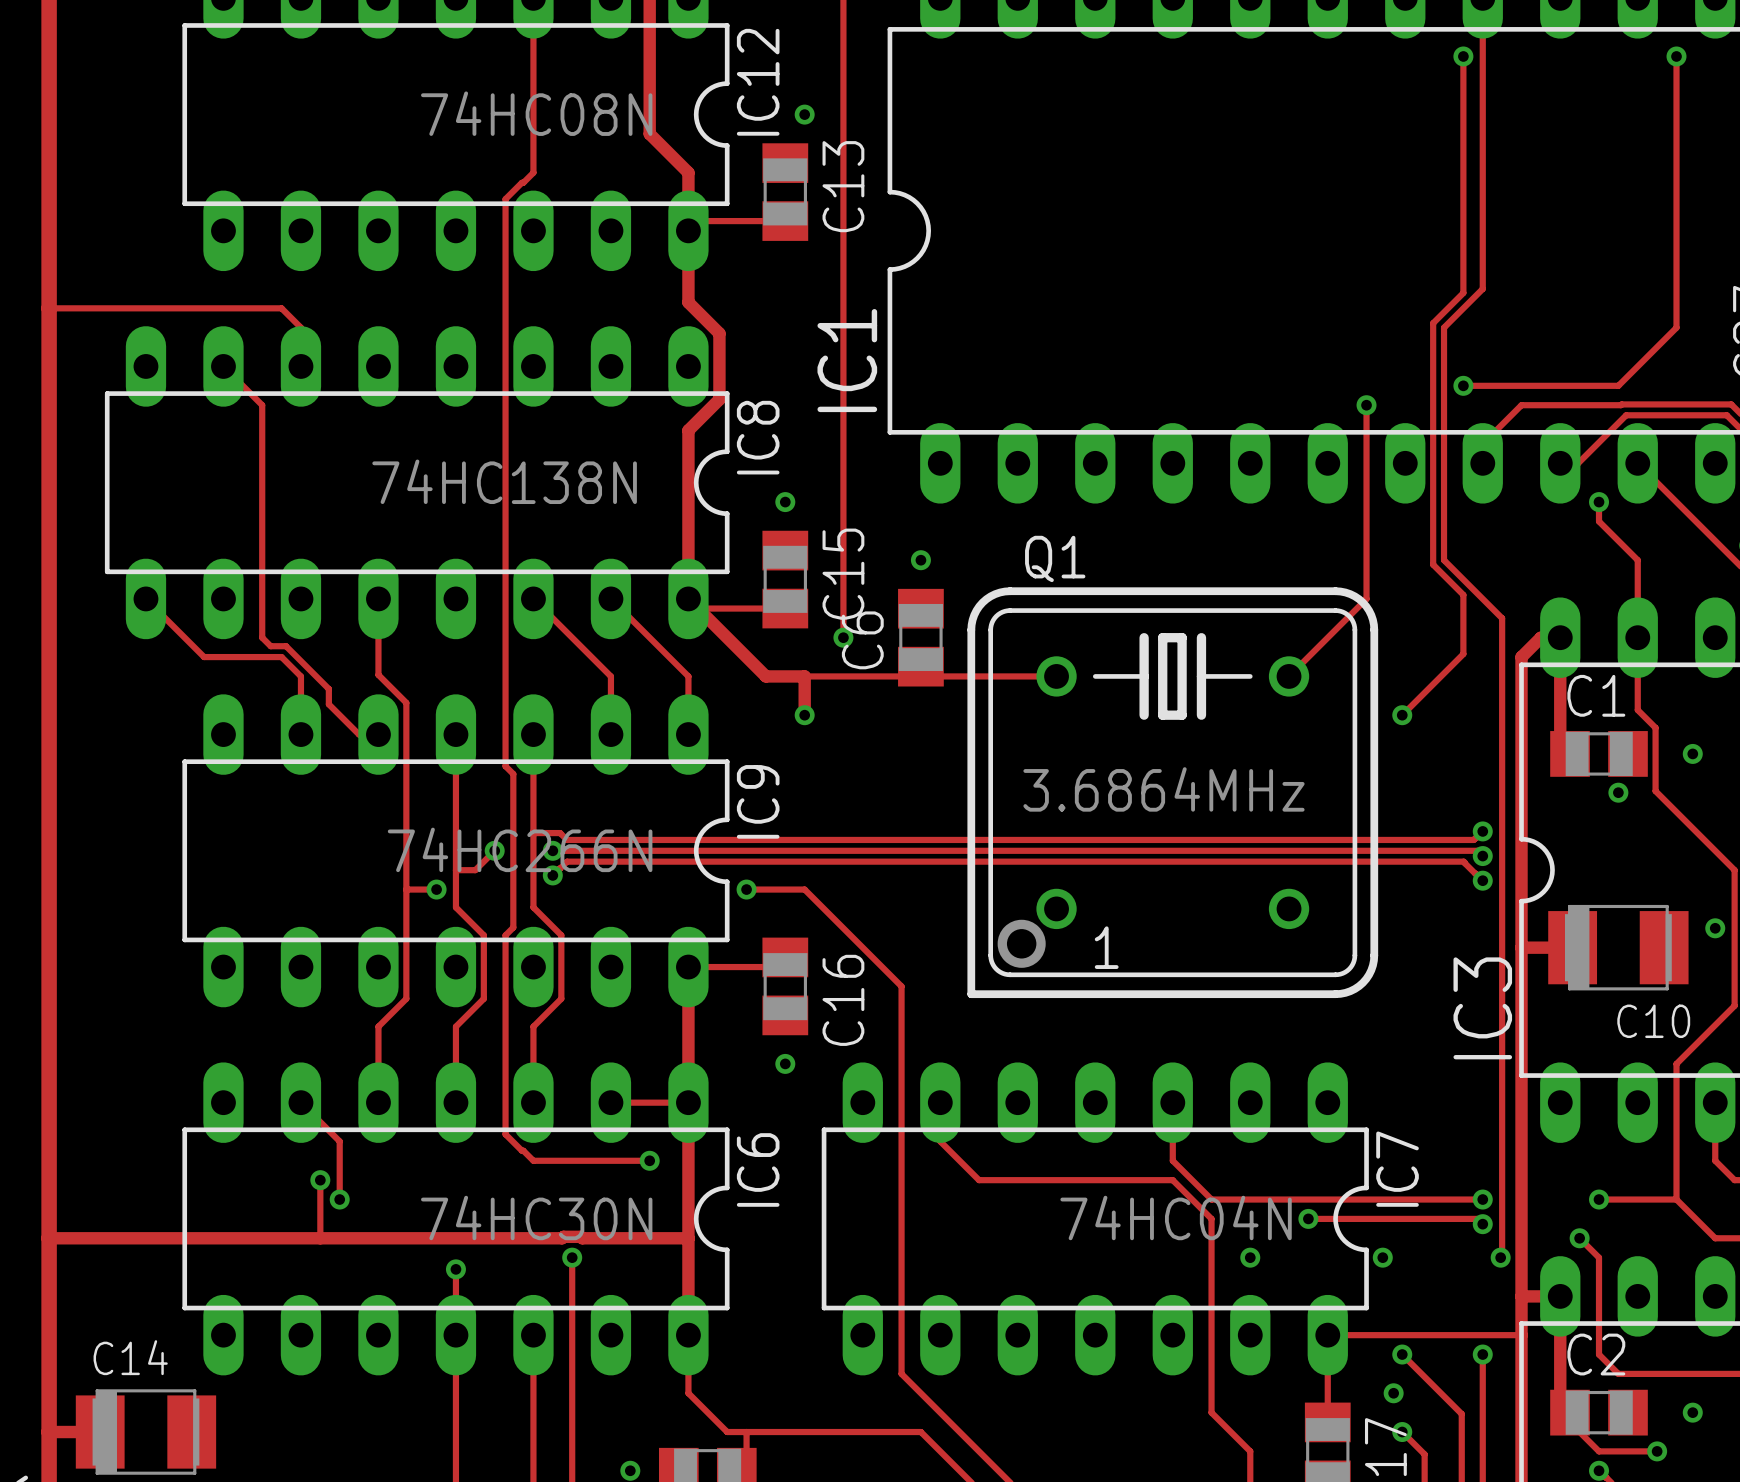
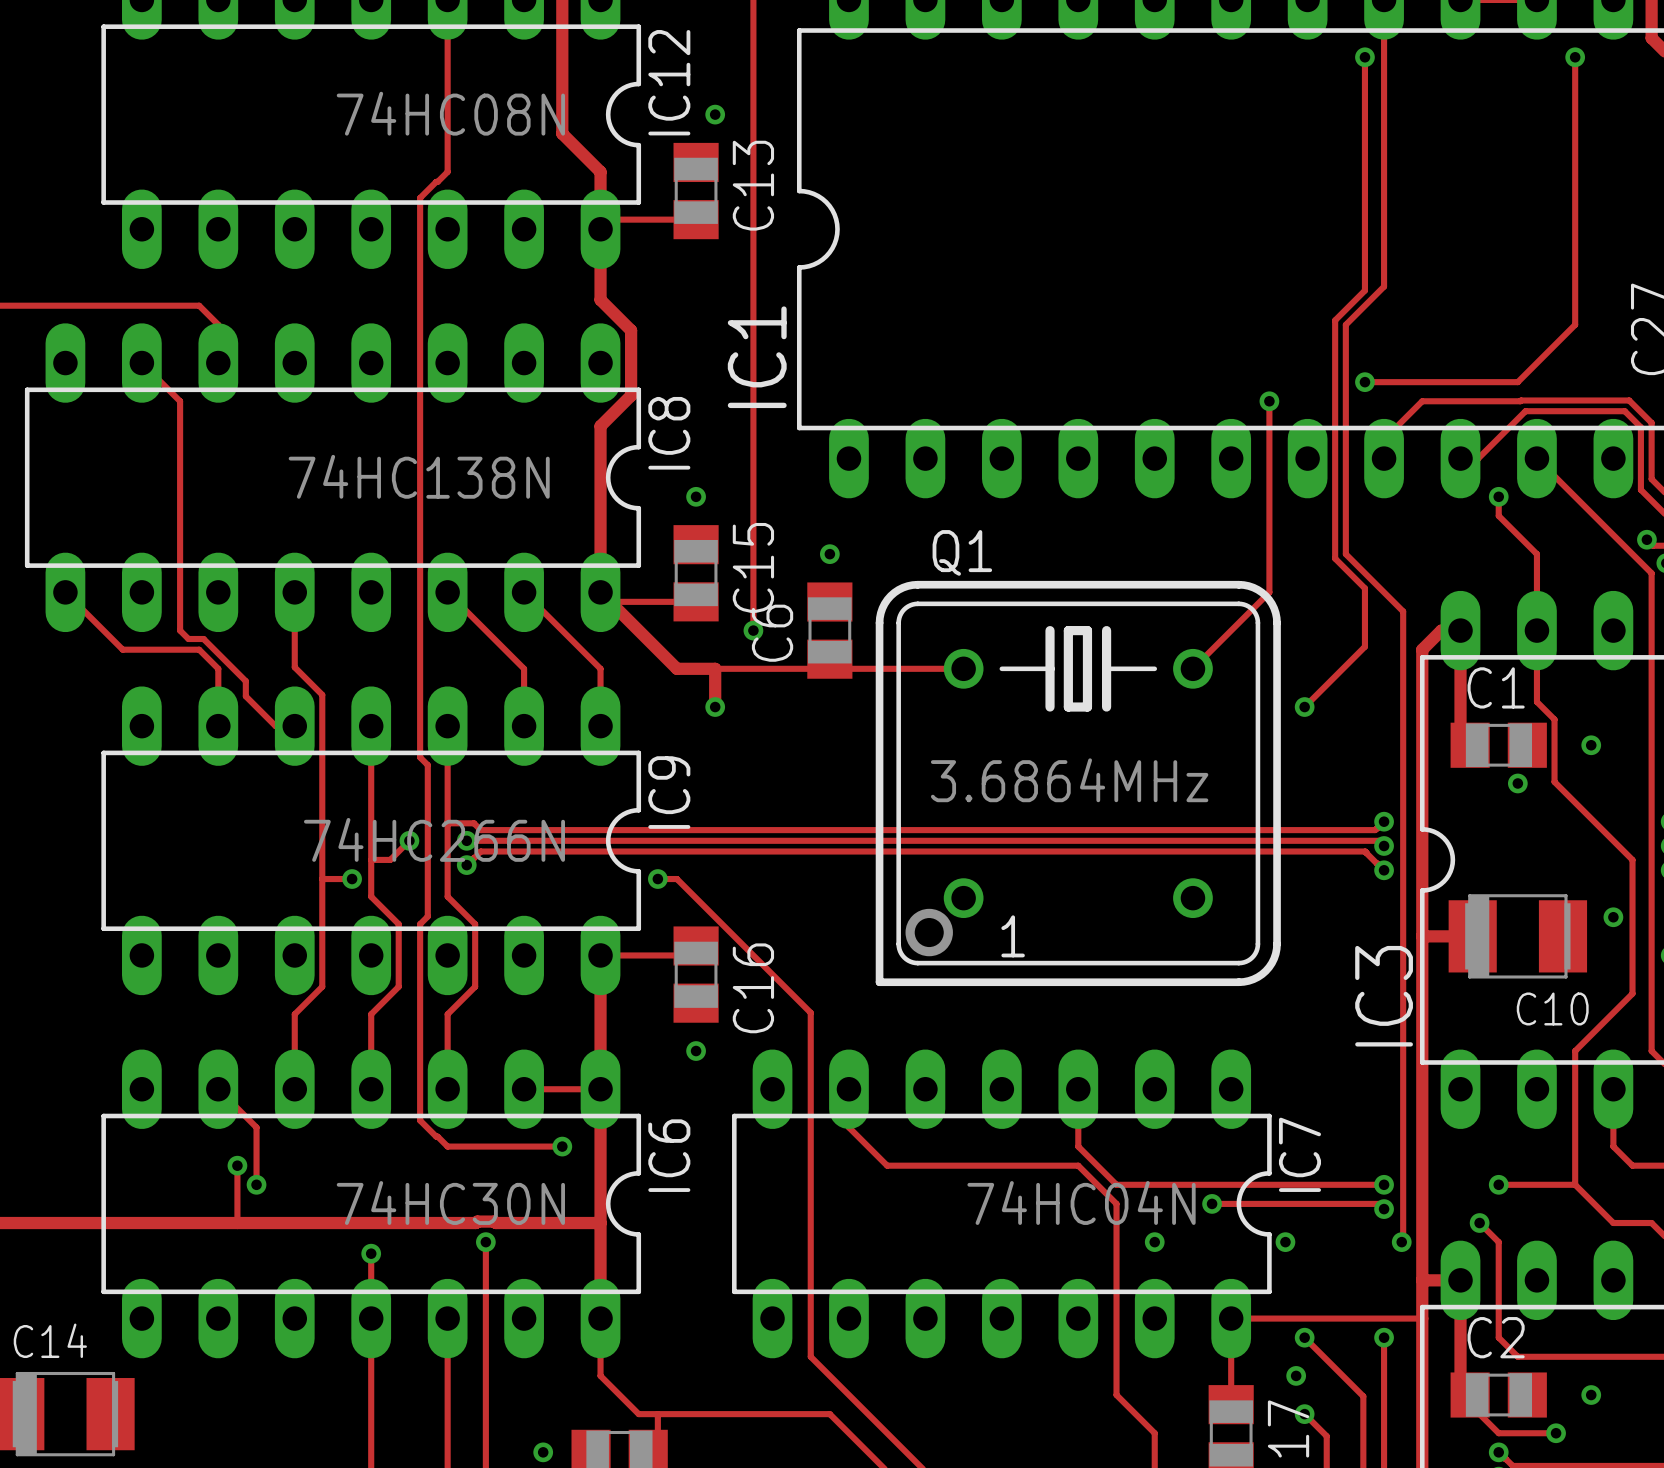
track: (765, 889) (804, 889) (901, 986) (901, 1025) -> (676, 879) (810, 1012)

